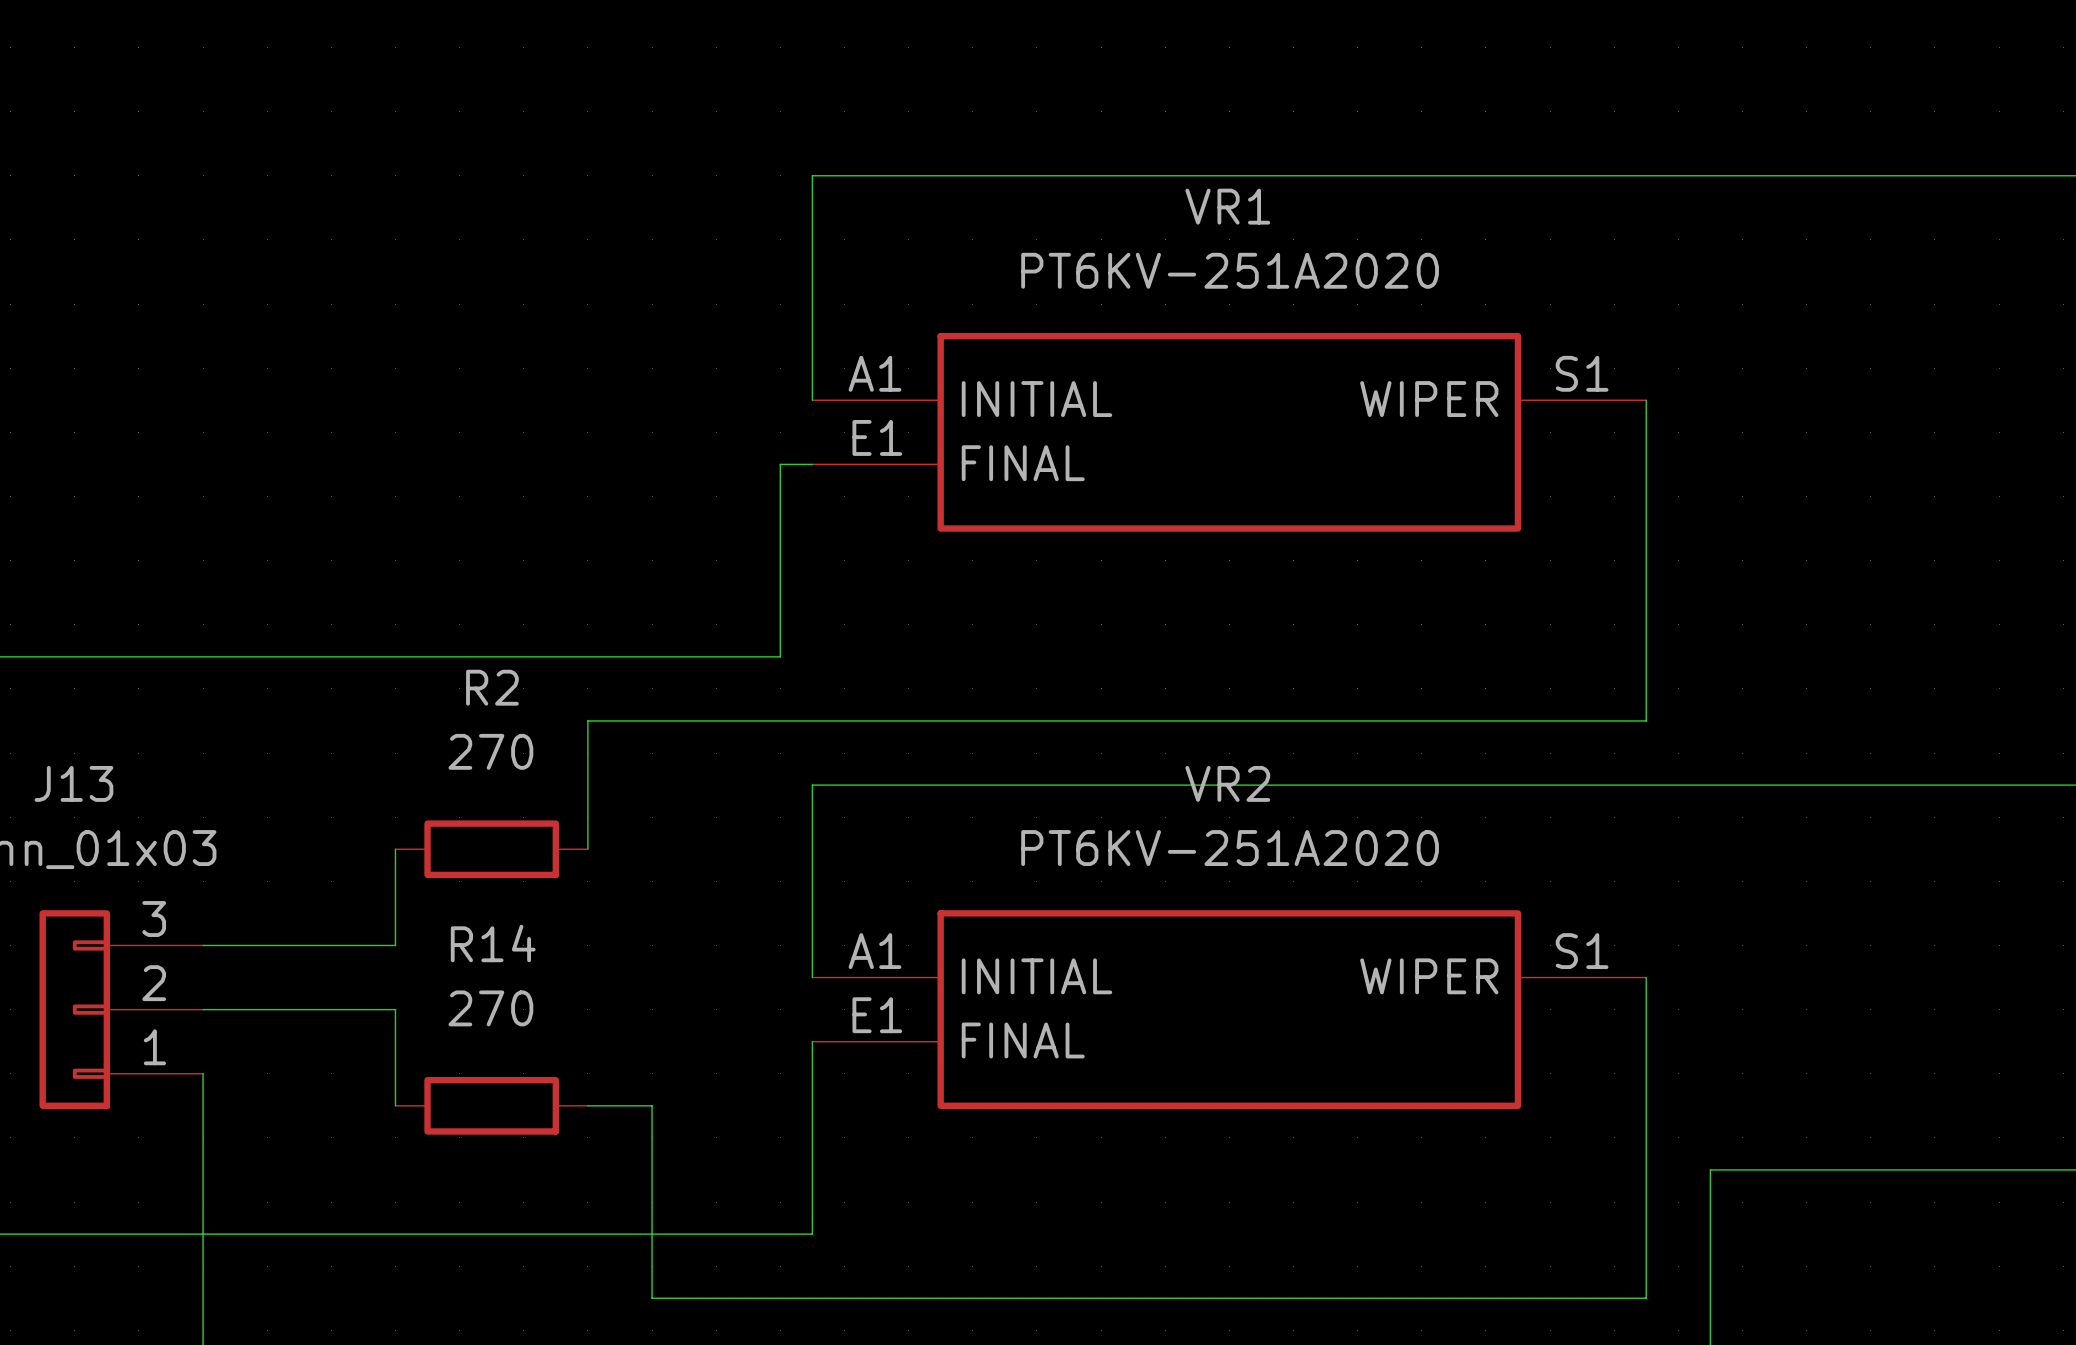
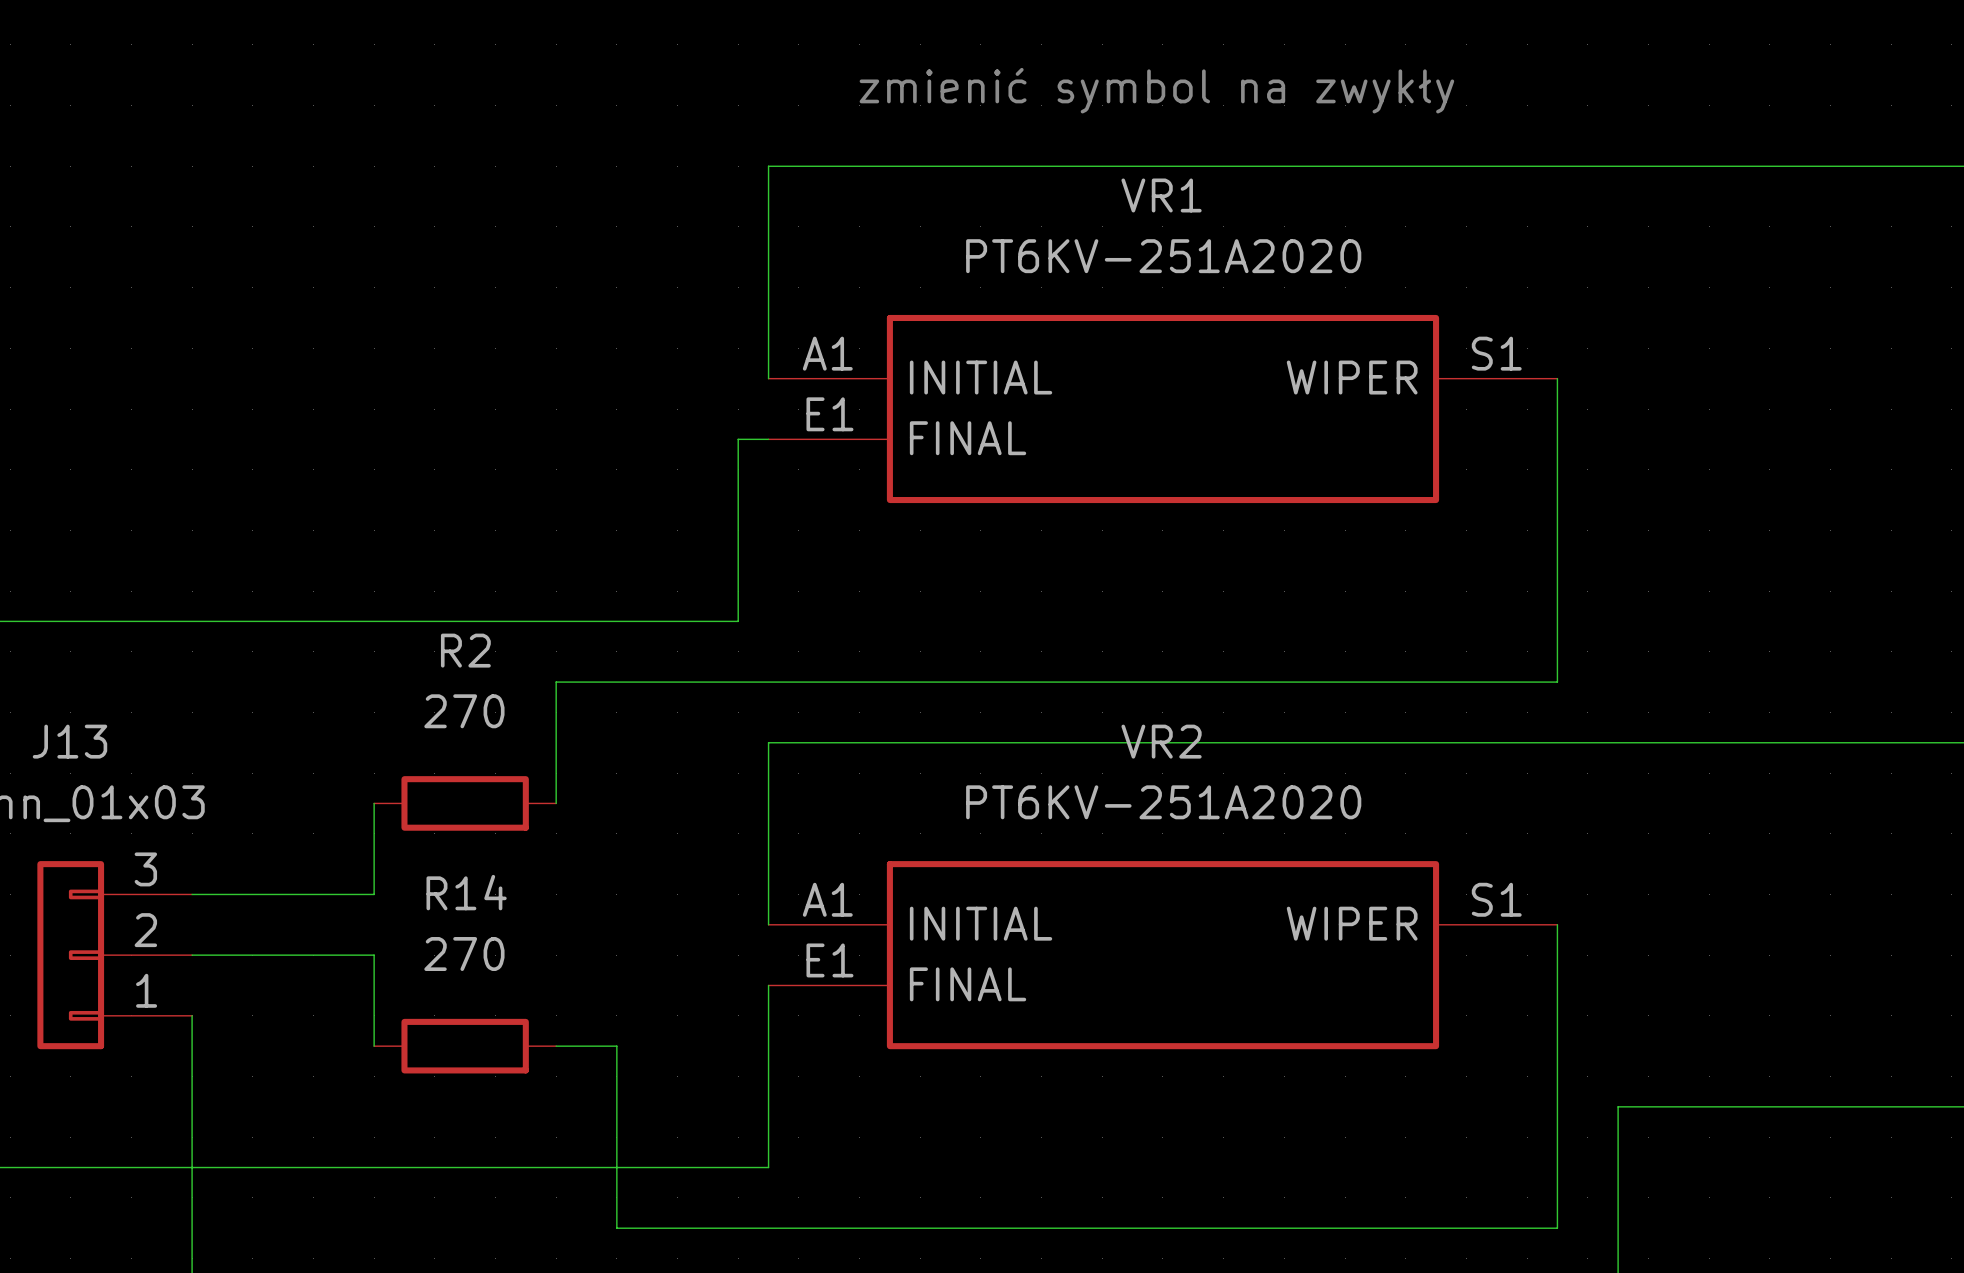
text: none -> zmienić symbol na zwykły (1156, 90)

